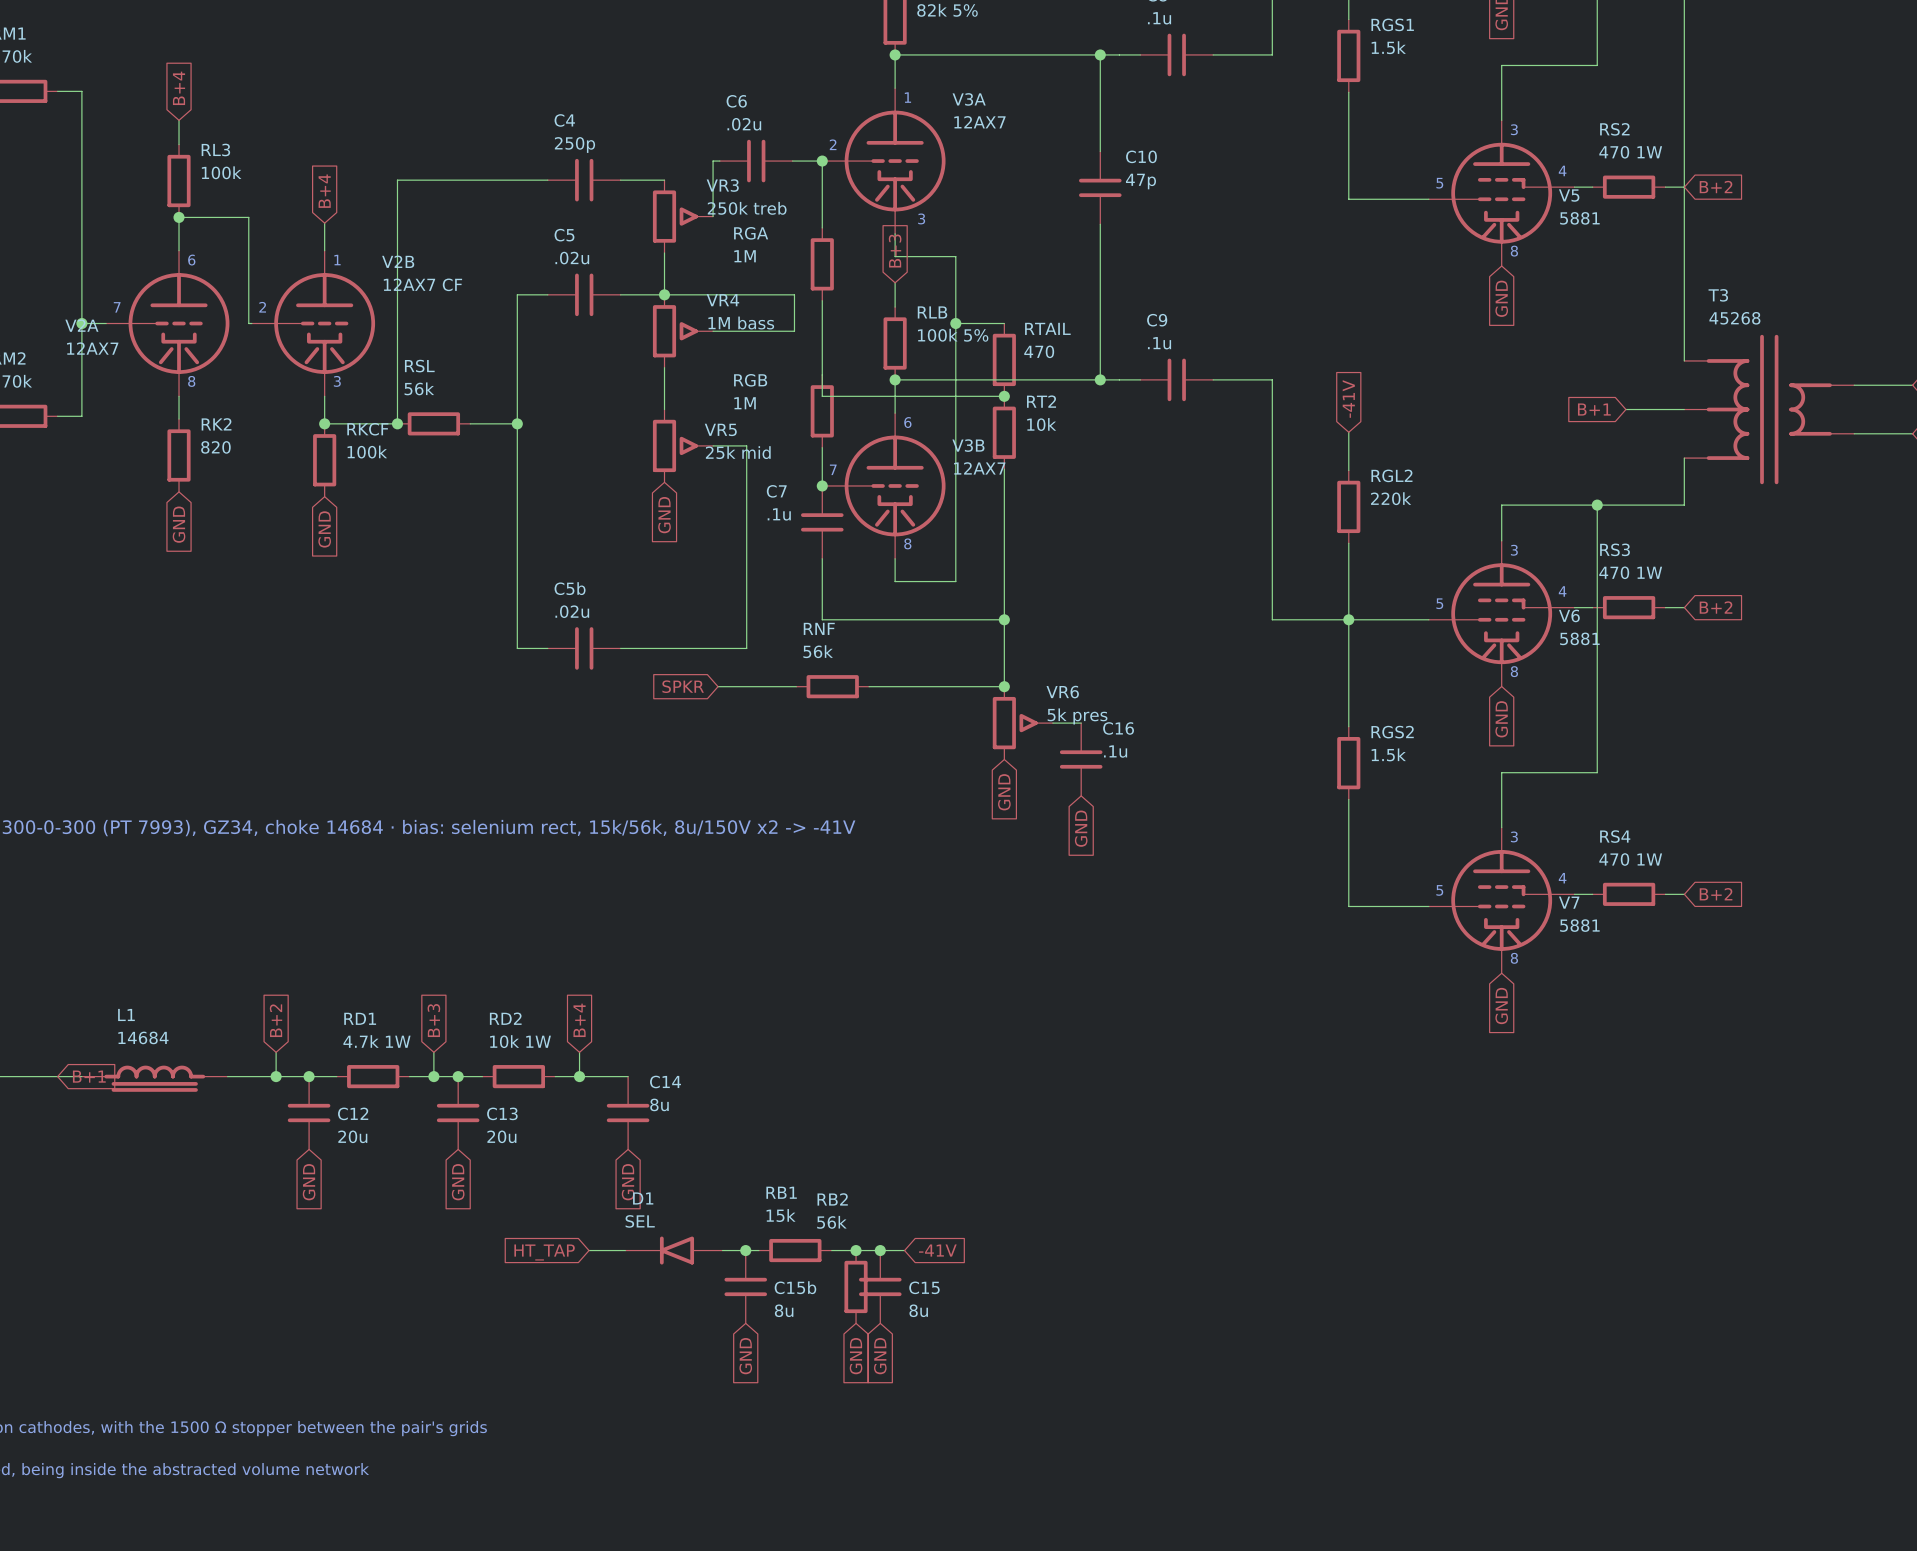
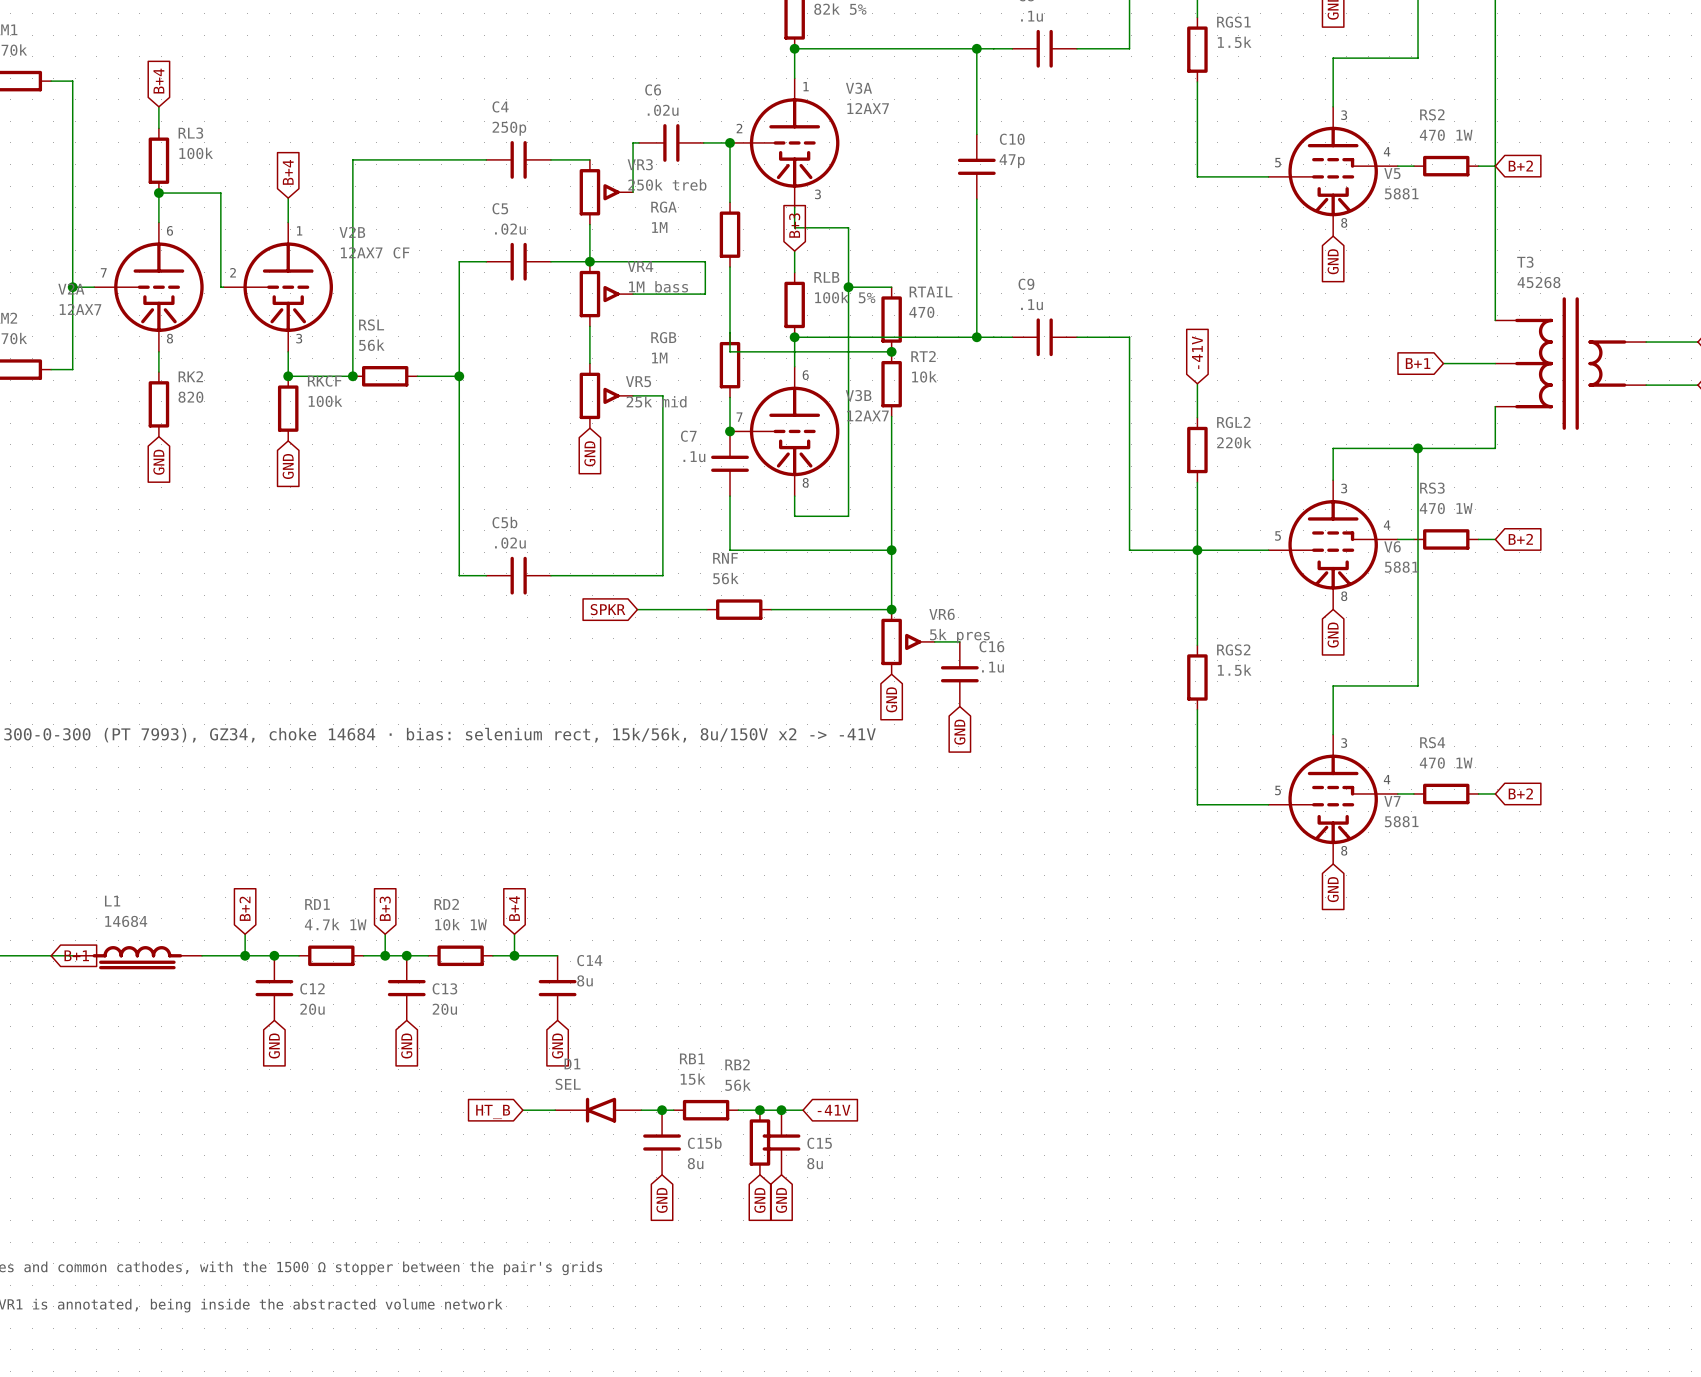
global label: HT_TAP (544, 1252) -> HT_B (493, 1111)

